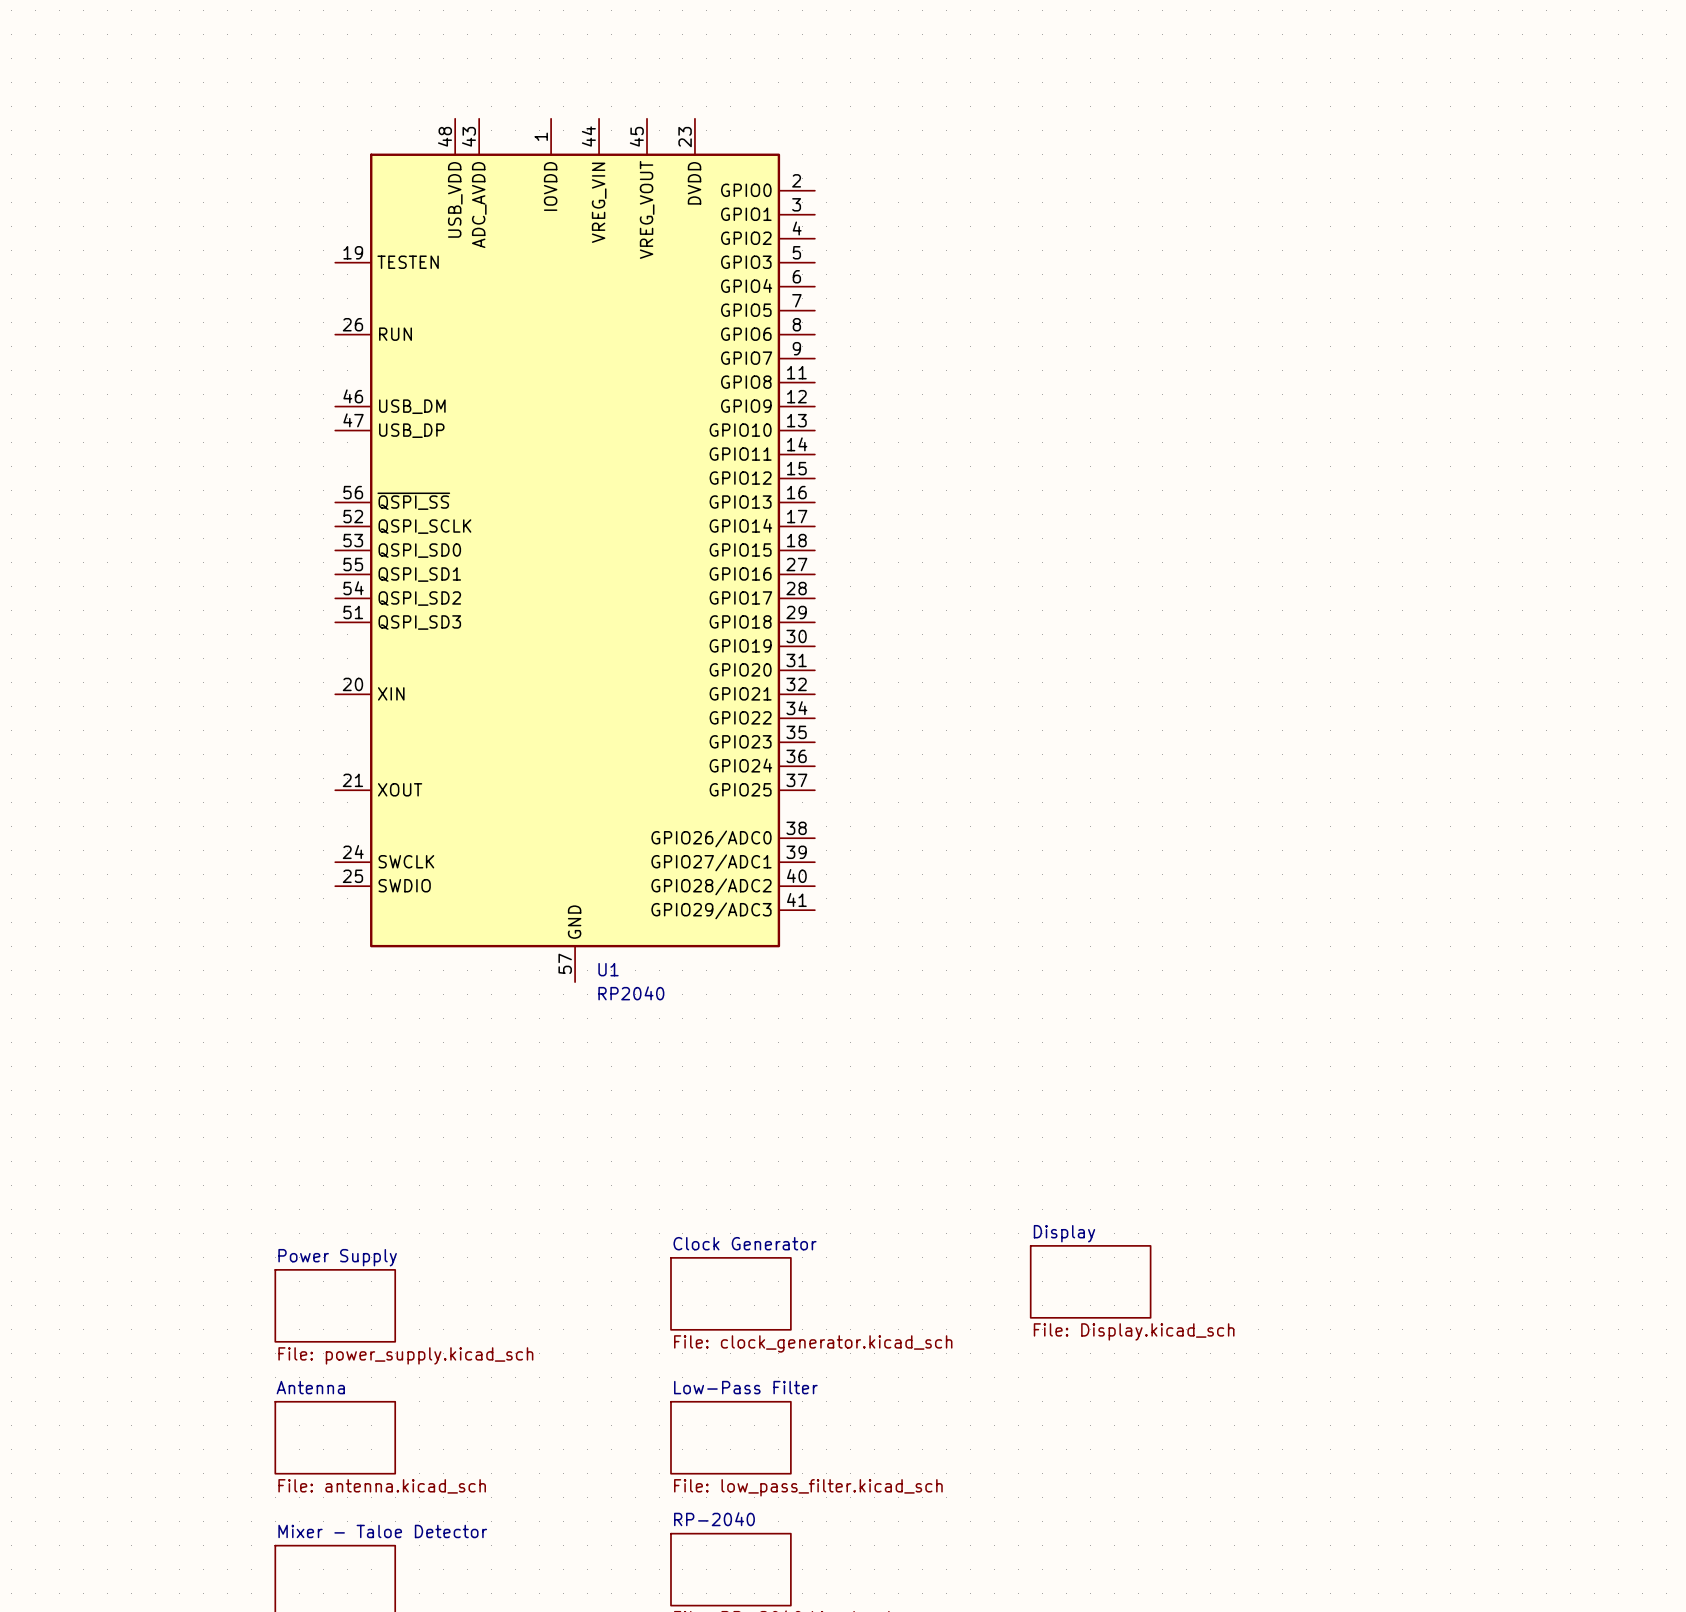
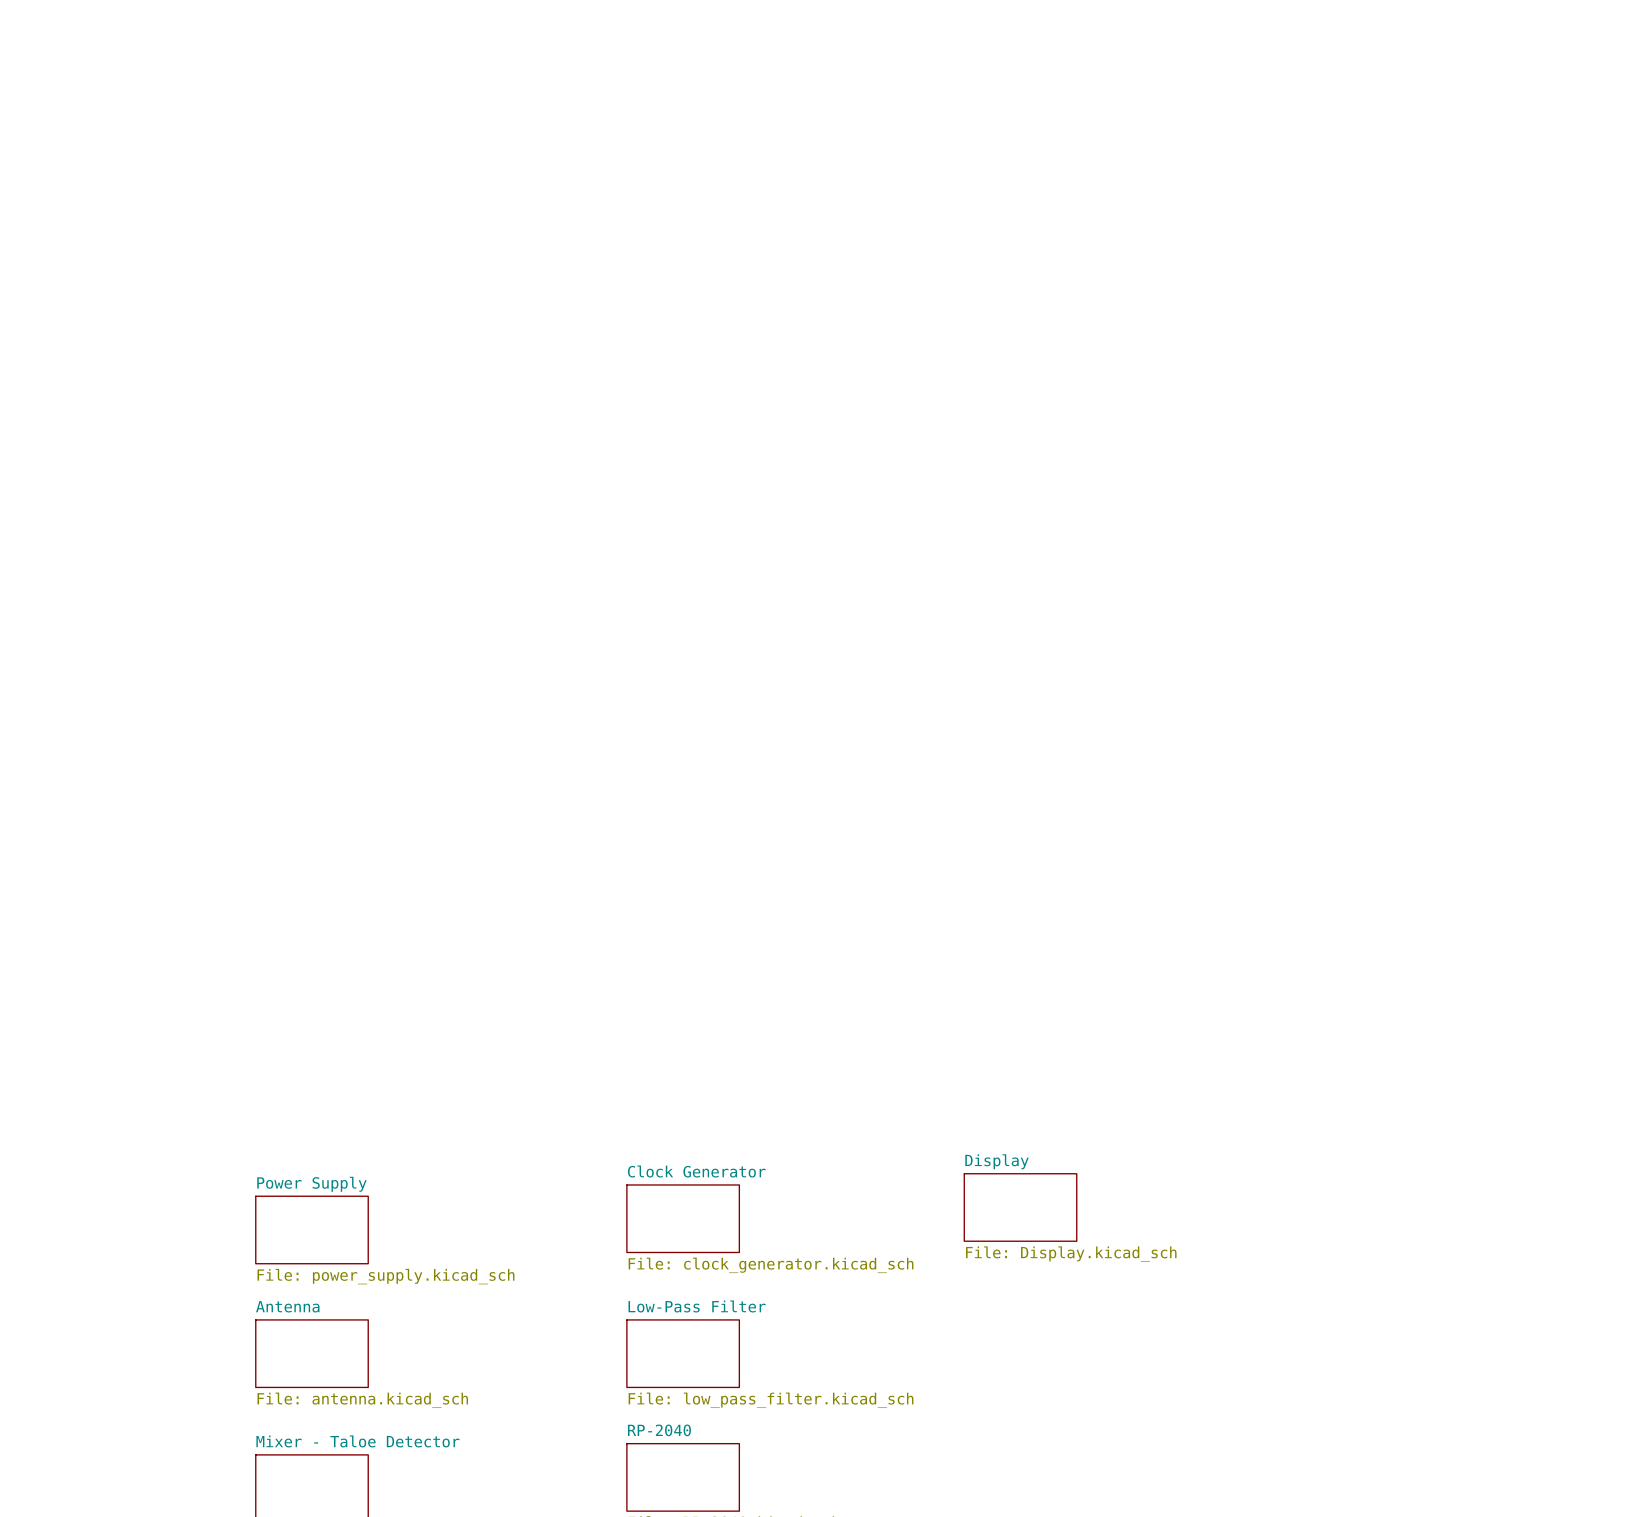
U1: RP2040 (575, 550) -> none

